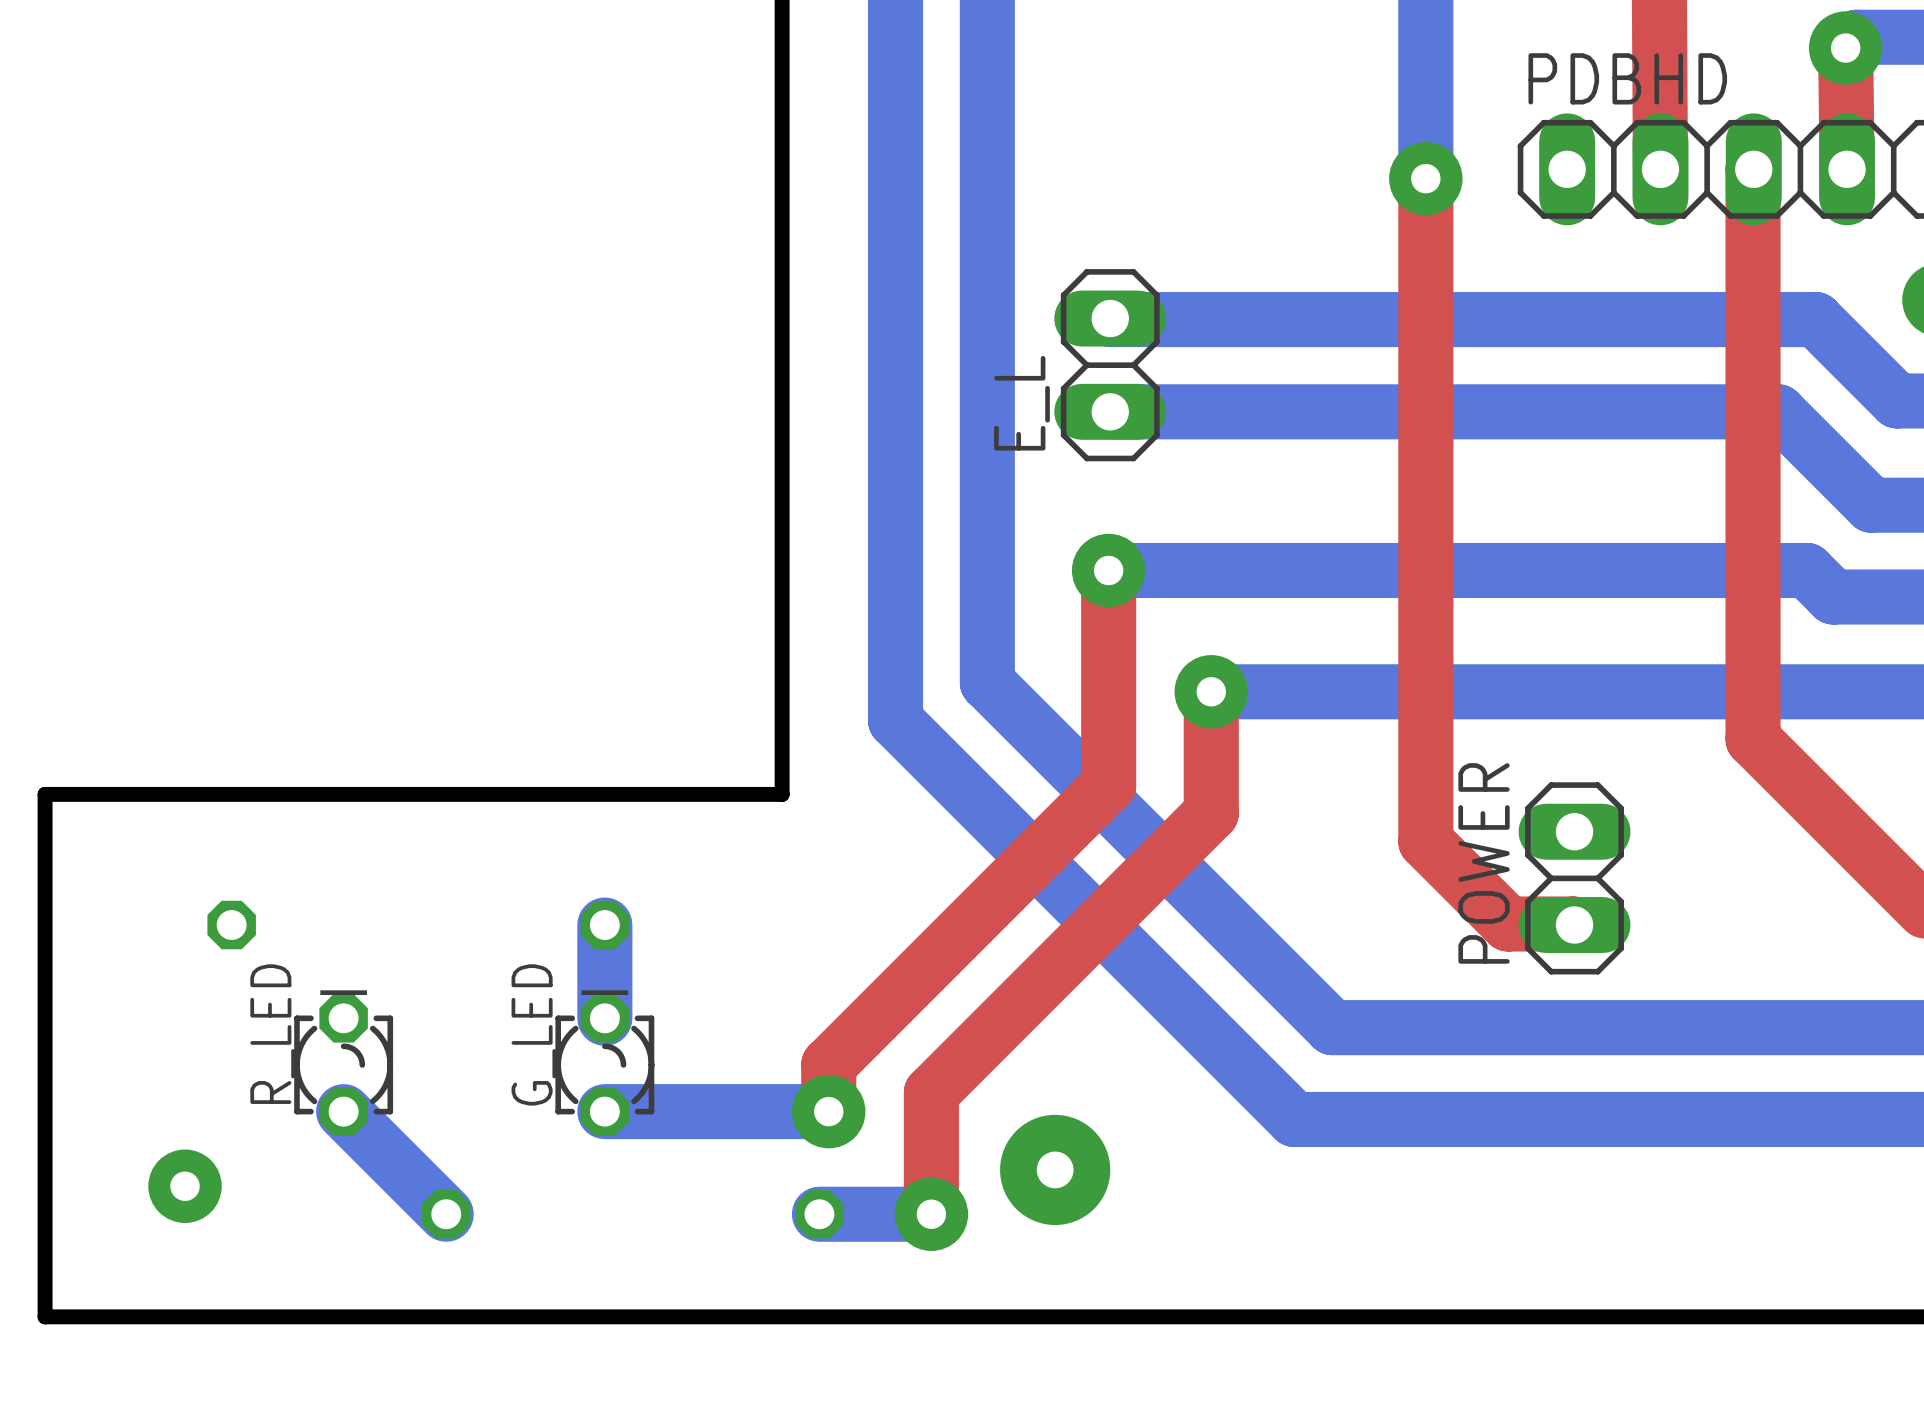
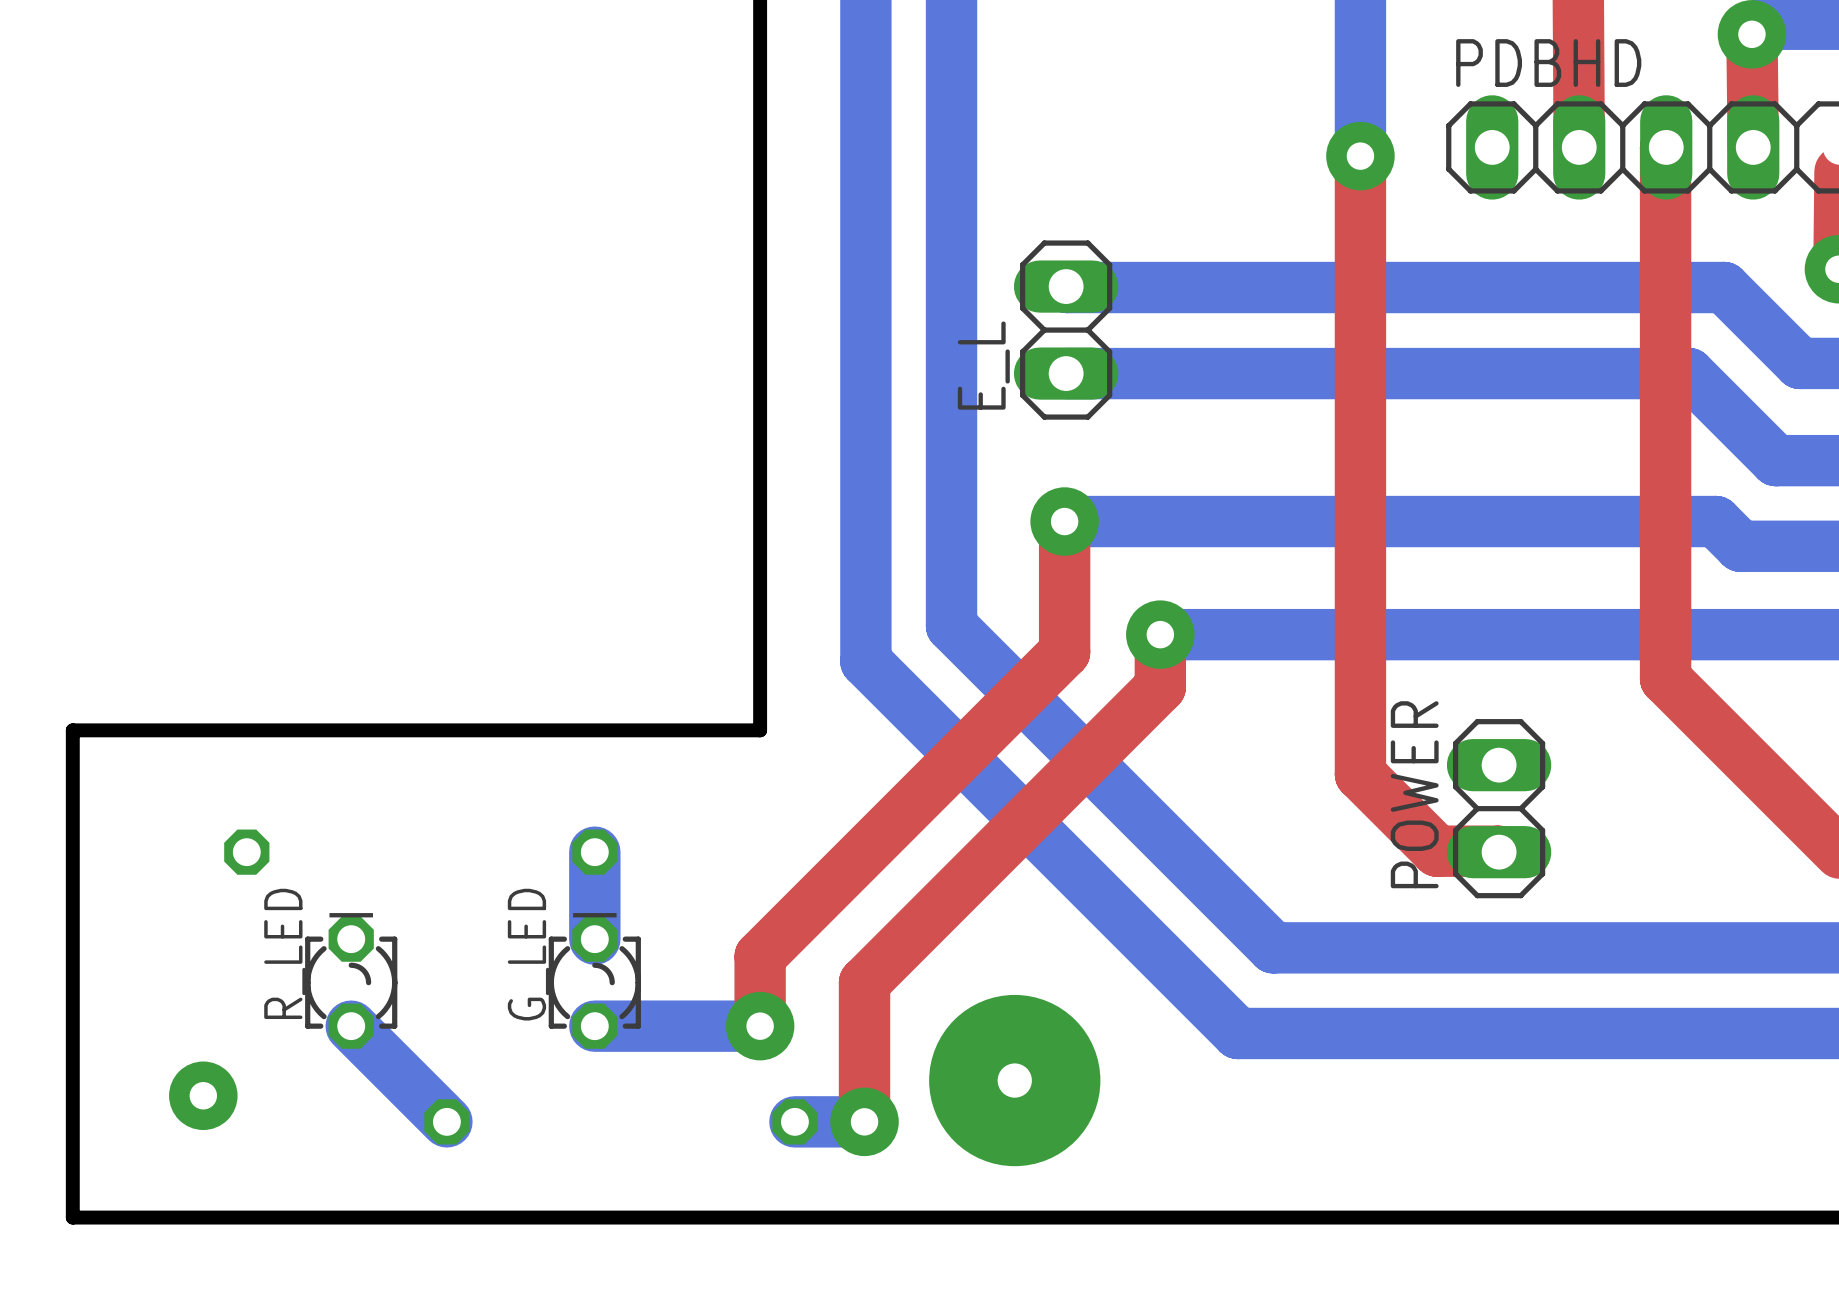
top track: (1108, 710) (1108, 785) (828, 1064) (828, 1111) -> (1064, 652) (760, 956) (760, 1026)
top track: (1211, 747) (1211, 813) (931, 1092) (931, 1214) -> (1160, 686) (864, 982) (864, 1121)
via position: (828, 1111) -> (760, 1026)
via size: [1000, 1114, 1111, 1226] -> [929, 994, 1101, 1167]
via position: (931, 1214) -> (864, 1121)

